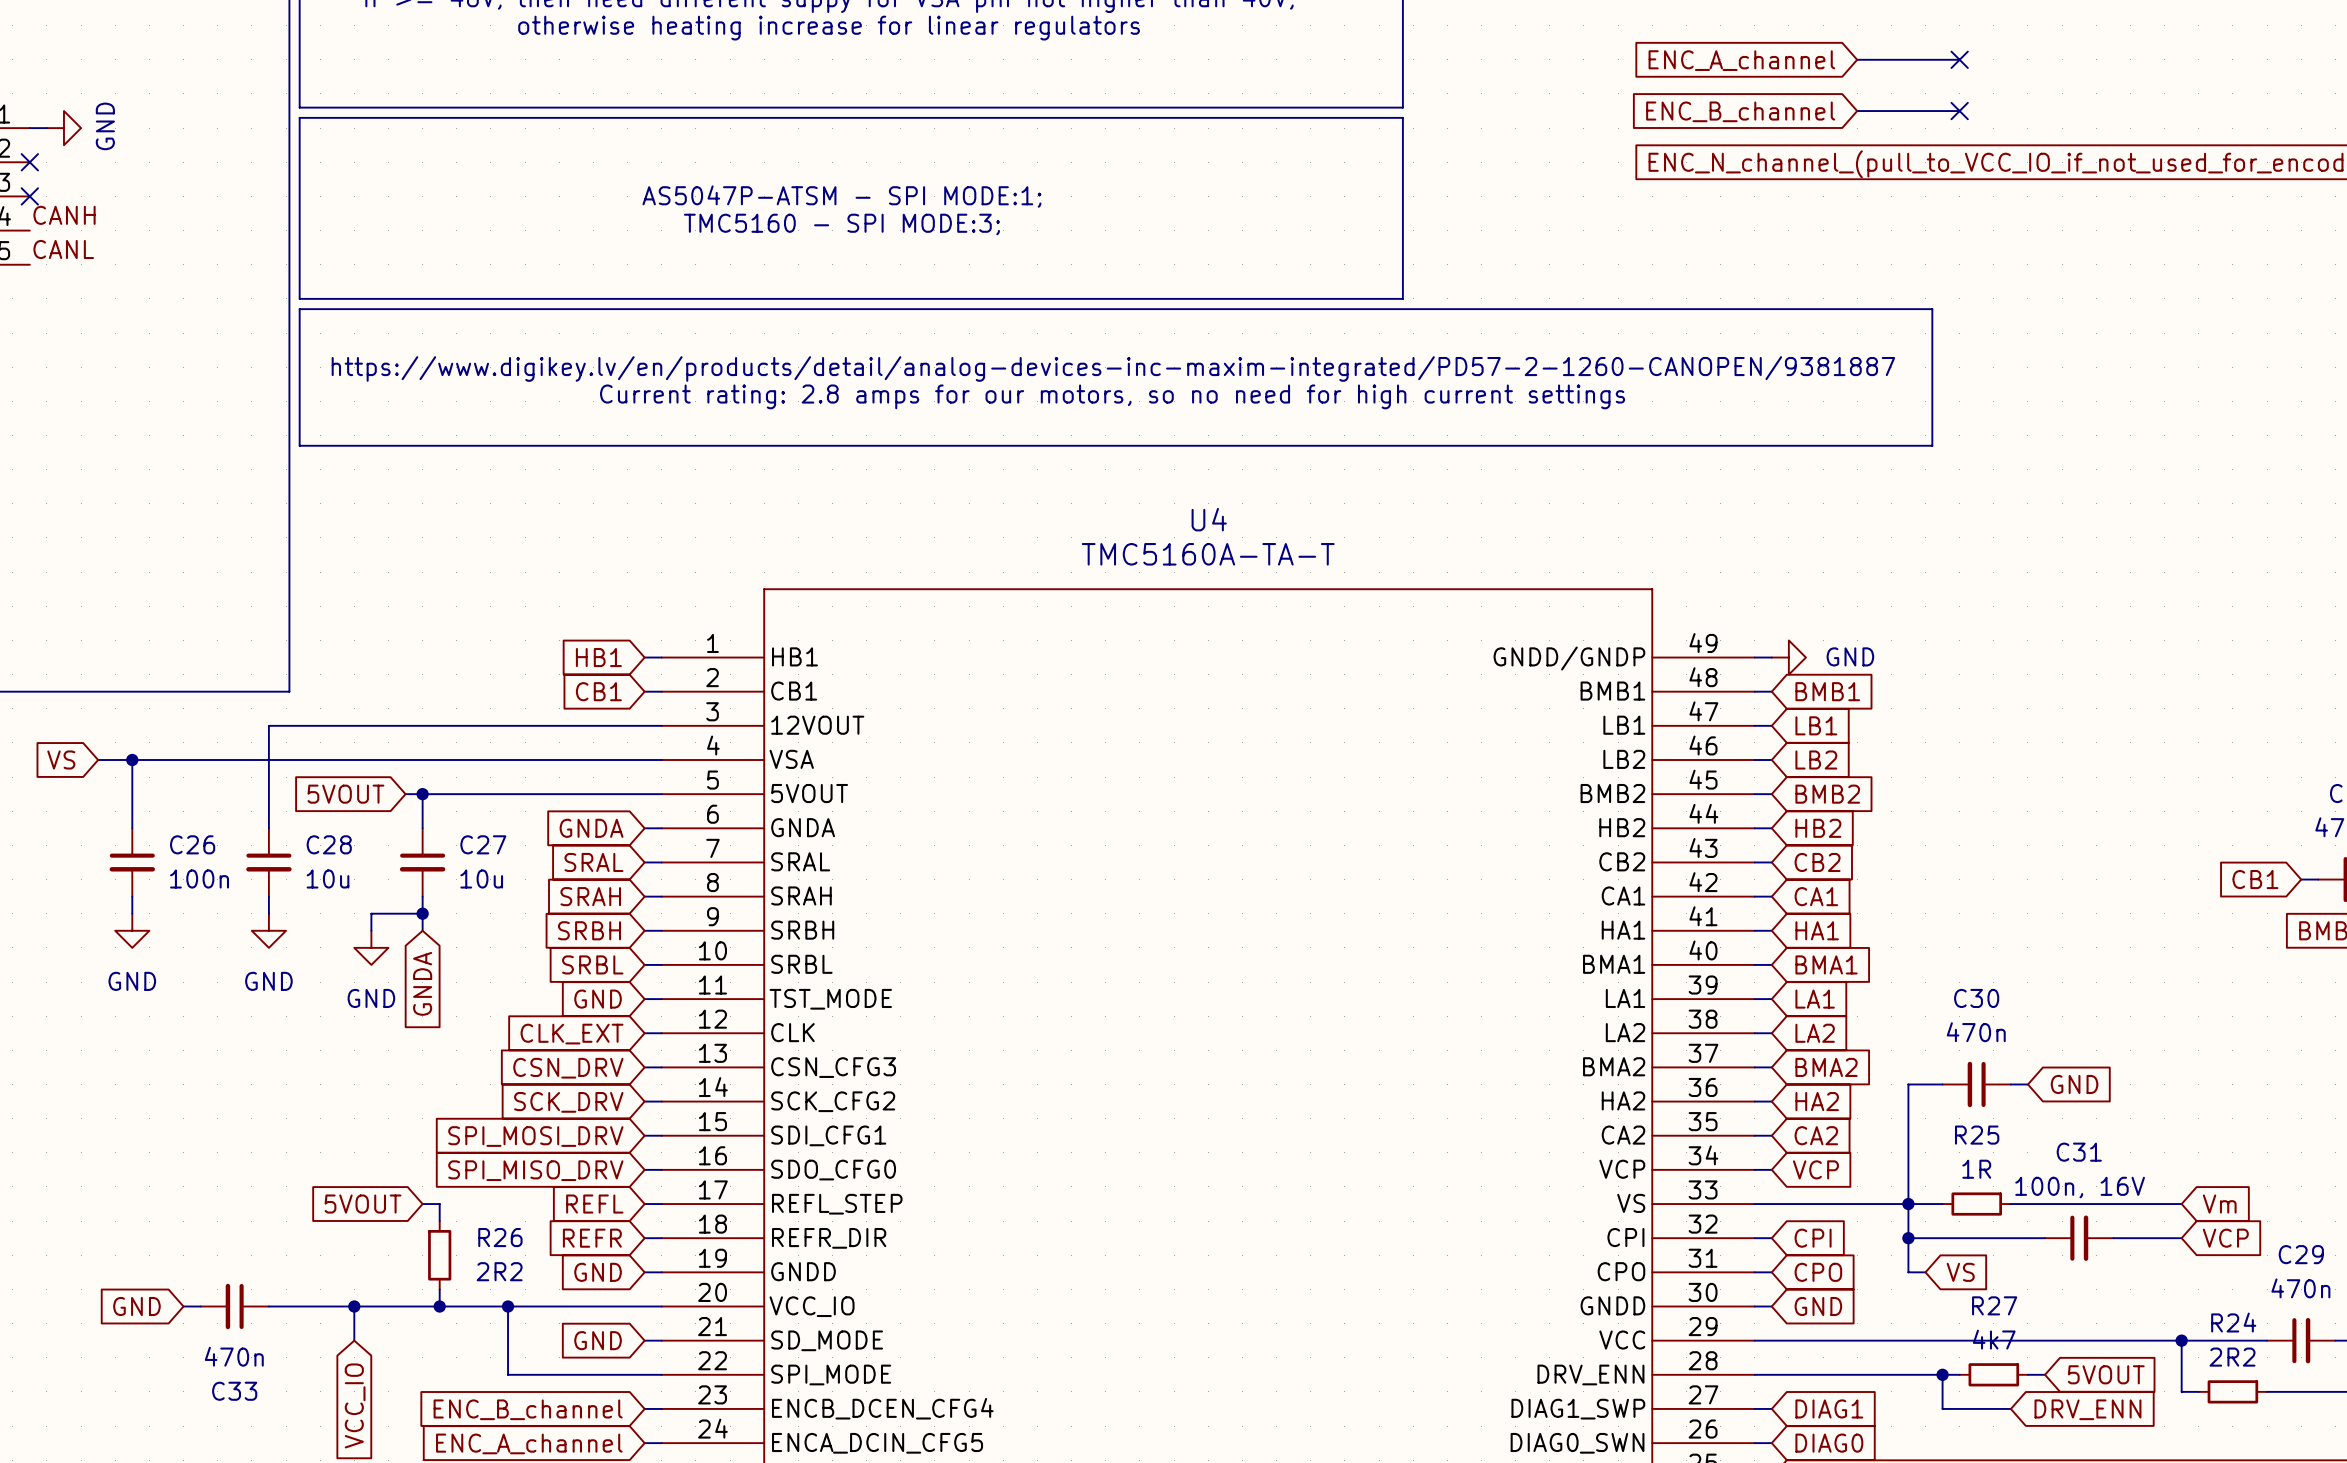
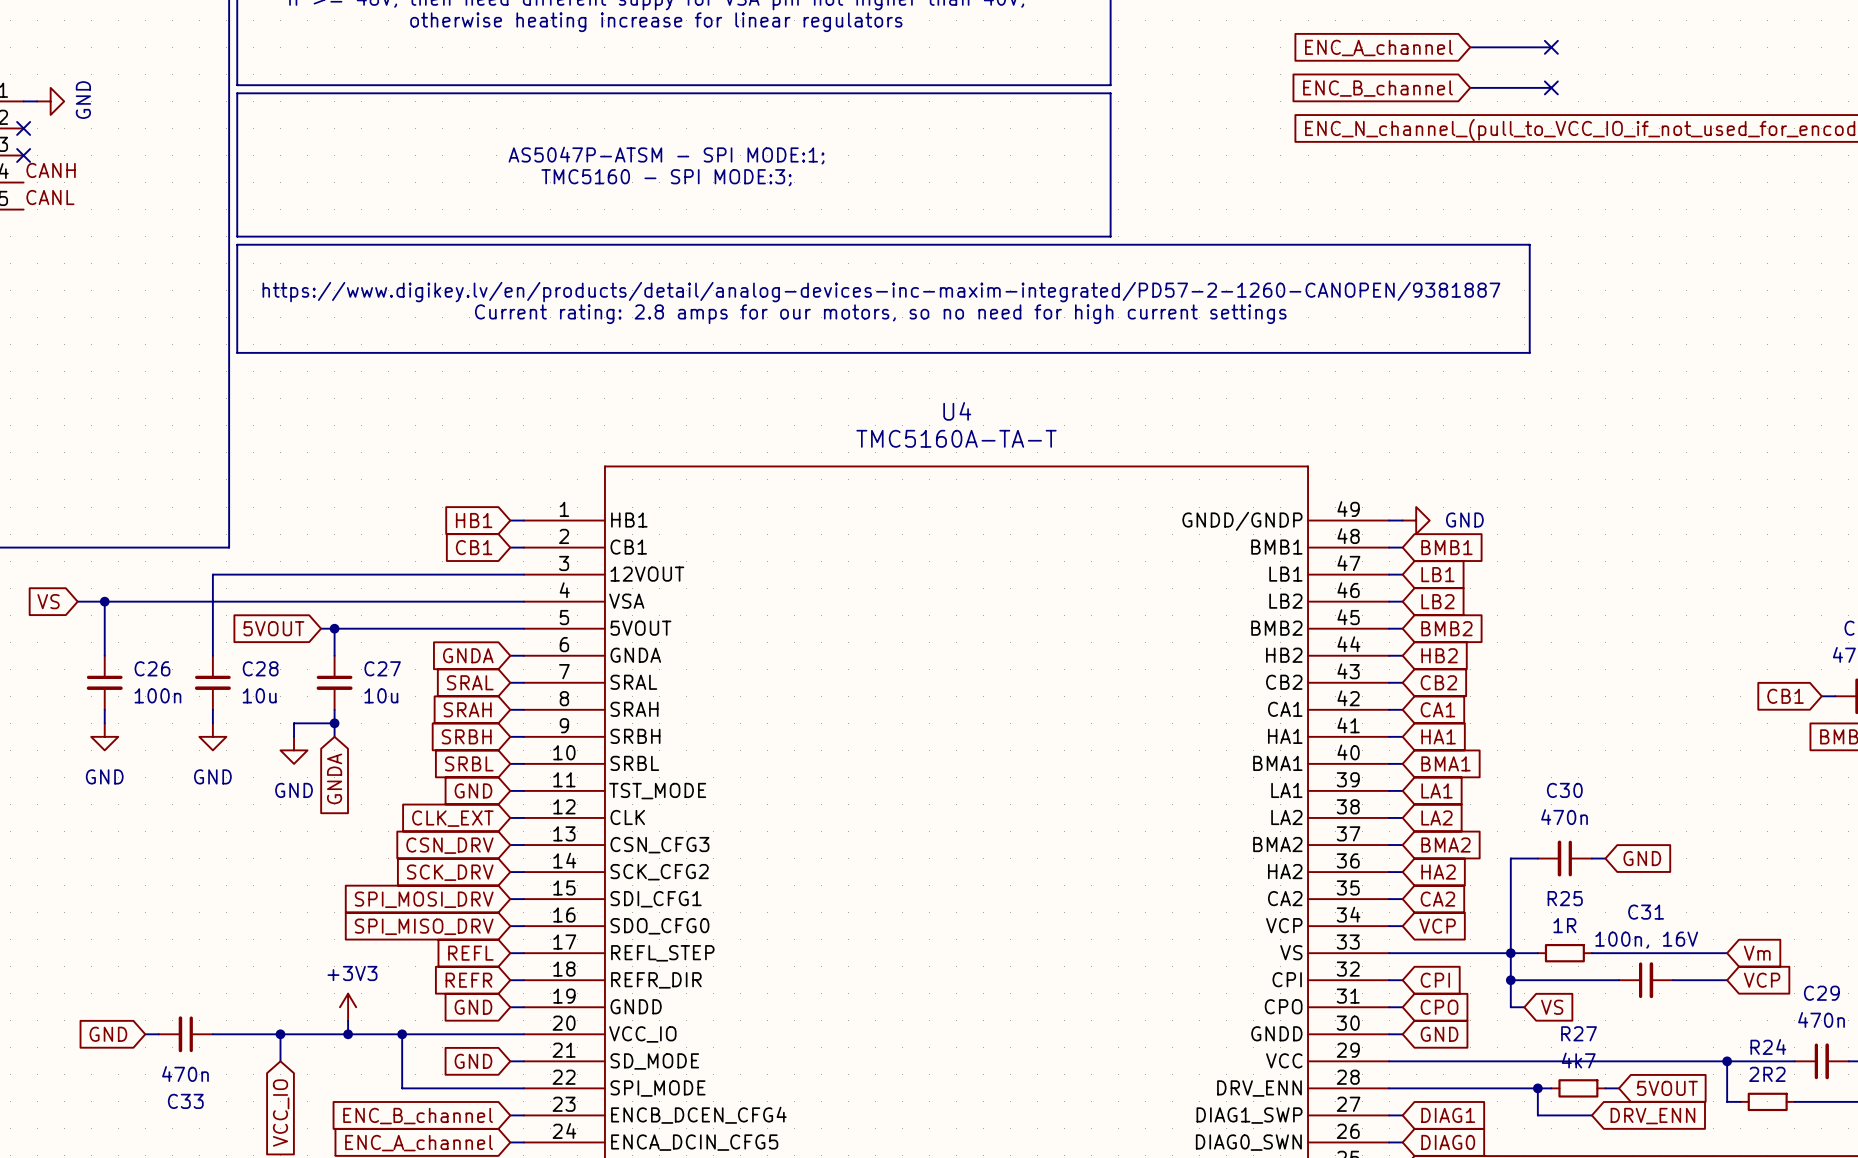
global label: 5VOUT (363, 1204) -> none
wire: (422, 1204) (439, 1204) (439, 1221) -> none
R26: 2R2 (439, 1255) -> none
power symbol: none -> +3V3 (348, 1007)

